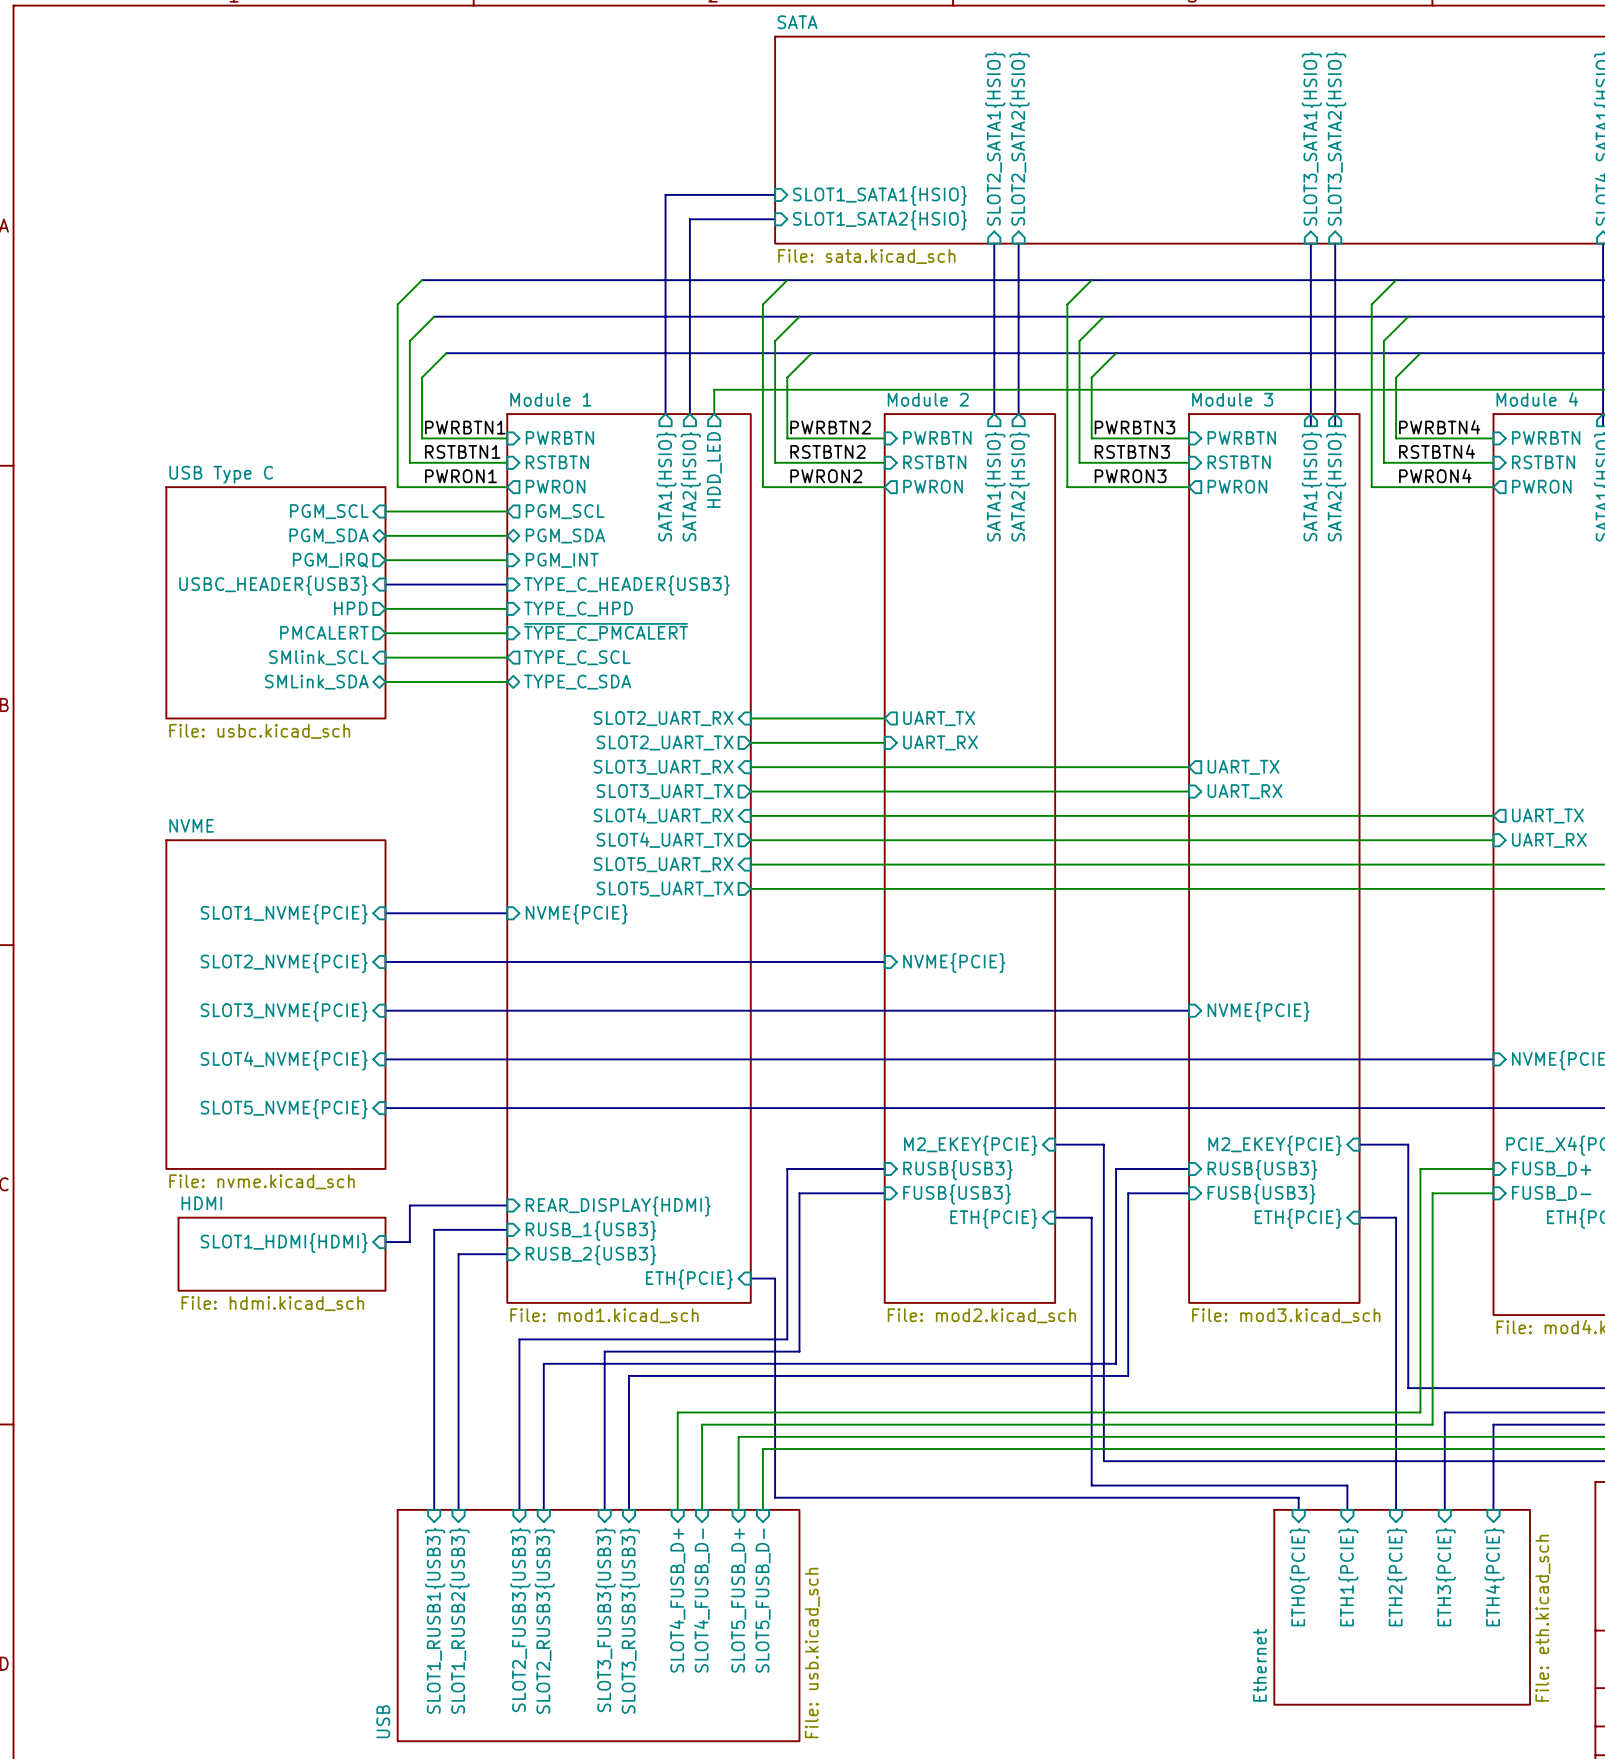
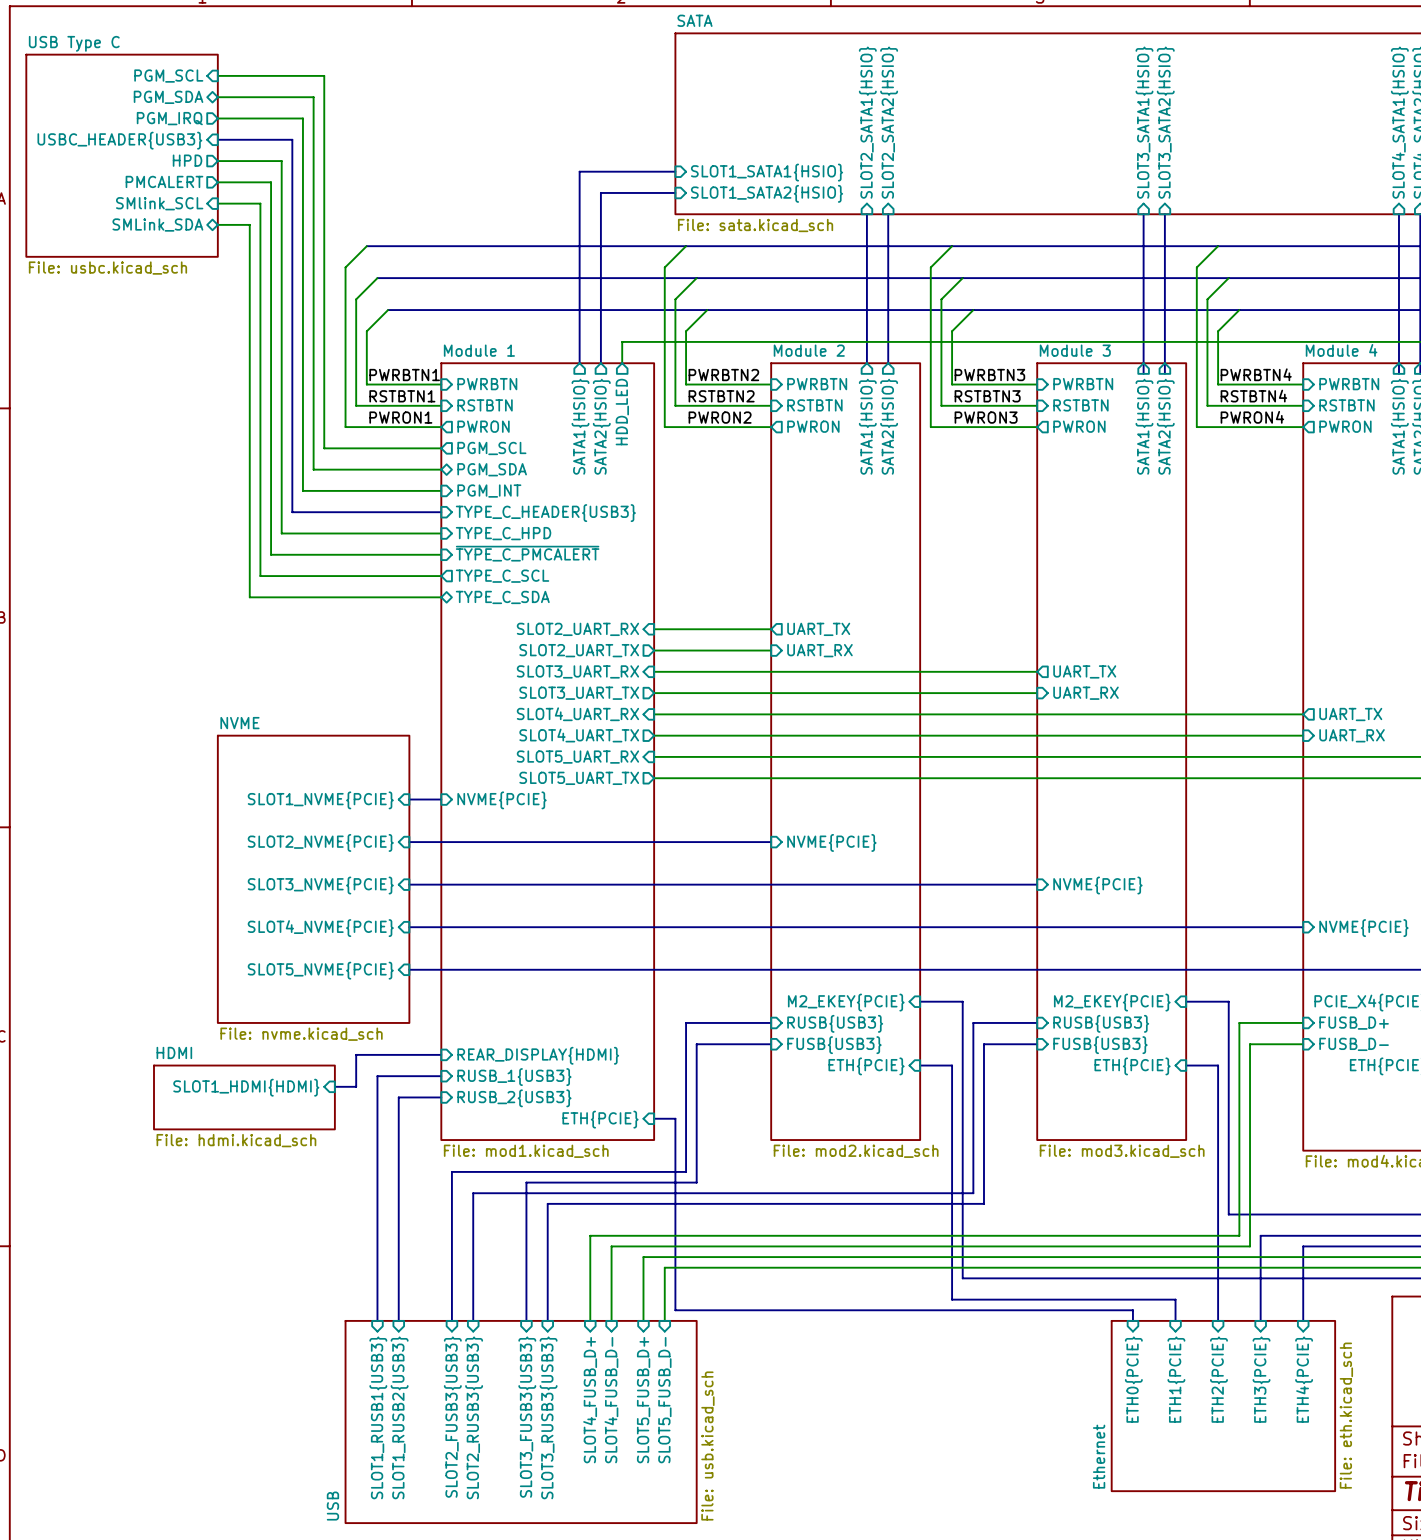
sheet pin: none -> PGM_SCL (168, 76)
wire: none -> (217, 75) (324, 75) (324, 448) (334, 448)
sheet pin: none -> PGM_SDA (168, 97)
wire: none -> (217, 97) (313, 97) (313, 469) (334, 469)
sheet pin: none -> PGM_IRQ (169, 118)
wire: none -> (217, 118) (302, 118) (302, 490) (334, 490)
bus: none -> (217, 139) (292, 139) (292, 512) (334, 512)
sheet pin: none -> USBC_HEADER{USB3} (119, 140)
sheet USB Type C: none -> File: usbc.kicad_sch (122, 155)
sheet pin: none -> HPD (187, 160)
wire: none -> (217, 161) (281, 161) (281, 533) (334, 533)
sheet pin: none -> PMCALERT (164, 181)
wire: none -> (217, 182) (271, 182) (271, 554) (334, 554)
sheet pin: none -> SMlink_SCL (159, 203)
wire: none -> (217, 203) (260, 203) (260, 576) (334, 576)
sheet pin: none -> SMLink_SDA (157, 225)
wire: none -> (217, 224) (249, 224) (249, 597) (334, 597)
sheet pin: PGM_SCL (329, 511) -> none
sheet pin: PGM_SDA (329, 535) -> none
sheet pin: PGM_IRQ (330, 560) -> none
sheet pin: USBC_HEADER{USB3} (273, 585) -> none
sheet USB Type C: File: usbc.kicad_sch (275, 602) -> none
sheet pin: HPD (350, 608) -> none
sheet pin: PMCALERT (324, 632) -> none
sheet pin: SMlink_SCL (318, 657) -> none
sheet pin: SMLink_SDA (316, 682) -> none
bus: (385, 913) (470, 913) -> none
sheet pin position: SLOT1_NVME{PCIE} (284, 914) -> SLOT1_NVME{PCIE} (320, 800)
bus: (385, 961) (470, 961) -> none
sheet pin position: SLOT2_NVME{PCIE} (284, 962) -> SLOT2_NVME{PCIE} (320, 842)
sheet NVME position: (275, 1004) -> (313, 879)
bus: (385, 1010) (470, 1010) -> none
sheet pin position: SLOT3_NVME{PCIE} (284, 1011) -> SLOT3_NVME{PCIE} (320, 885)
bus: (385, 1059) (470, 1059) -> none
sheet pin position: SLOT4_NVME{PCIE} (284, 1060) -> SLOT4_NVME{PCIE} (320, 928)
bus: (385, 1108) (470, 1108) -> none
sheet pin position: SLOT5_NVME{PCIE} (284, 1109) -> SLOT5_NVME{PCIE} (320, 970)

